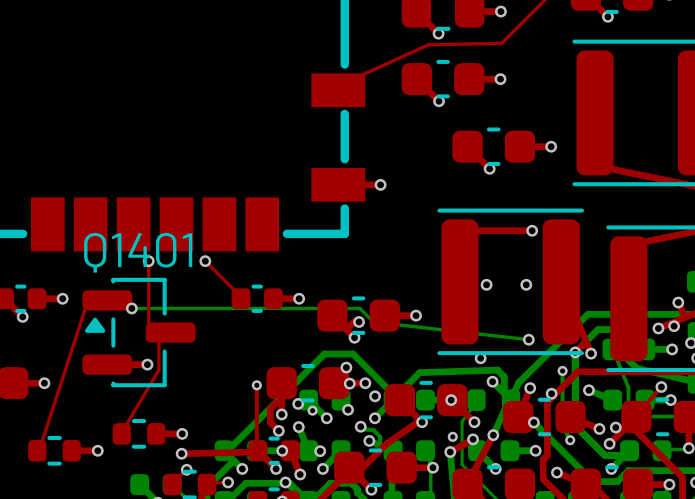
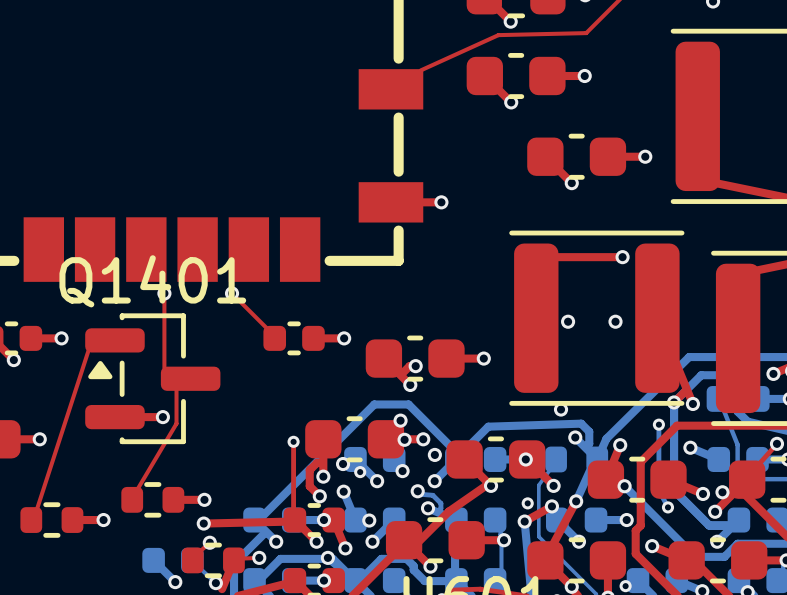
bottom track: (131, 308) (359, 308) (373, 321) (528, 339) -> none
via: (131, 308) -> none
via: (528, 339) -> none
via: (551, 393) -> none

